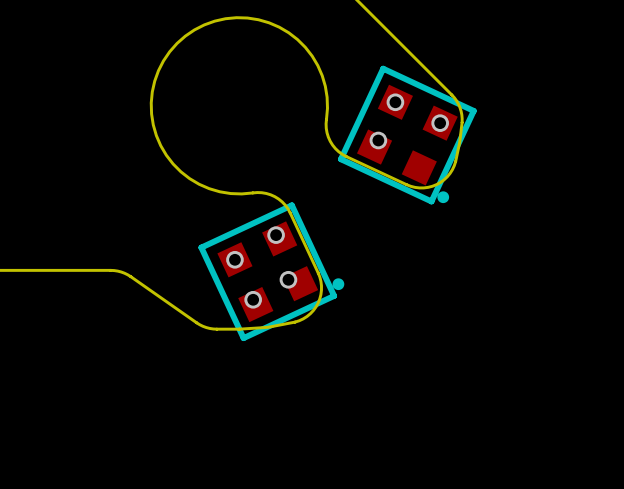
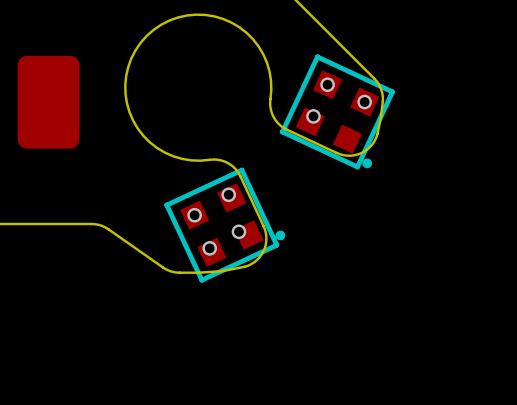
part: none -> (48, 102)

